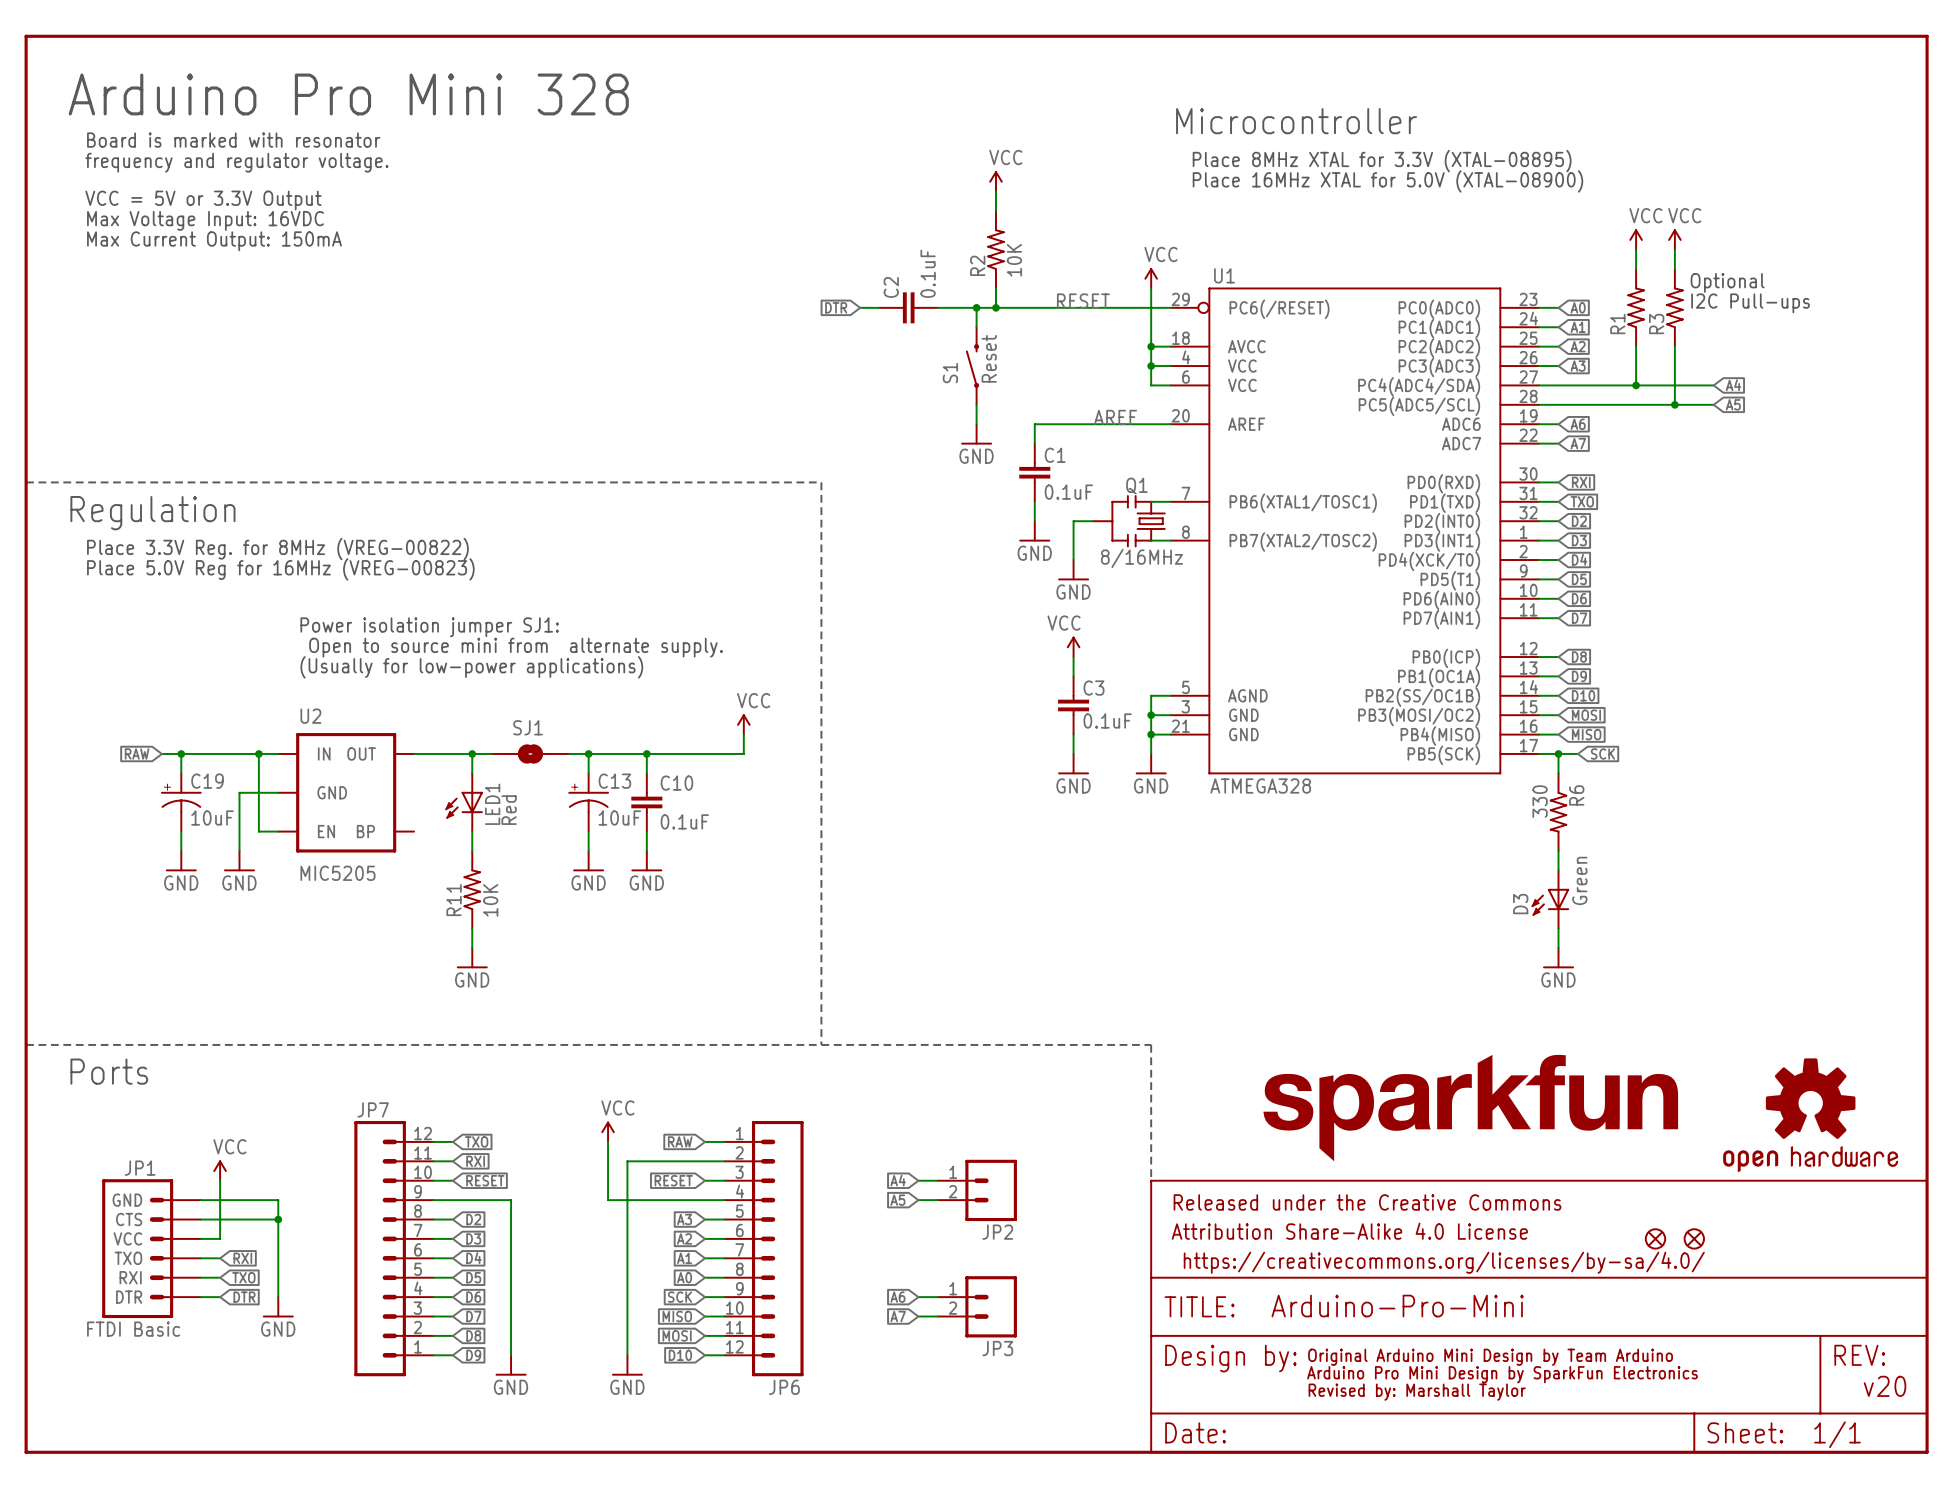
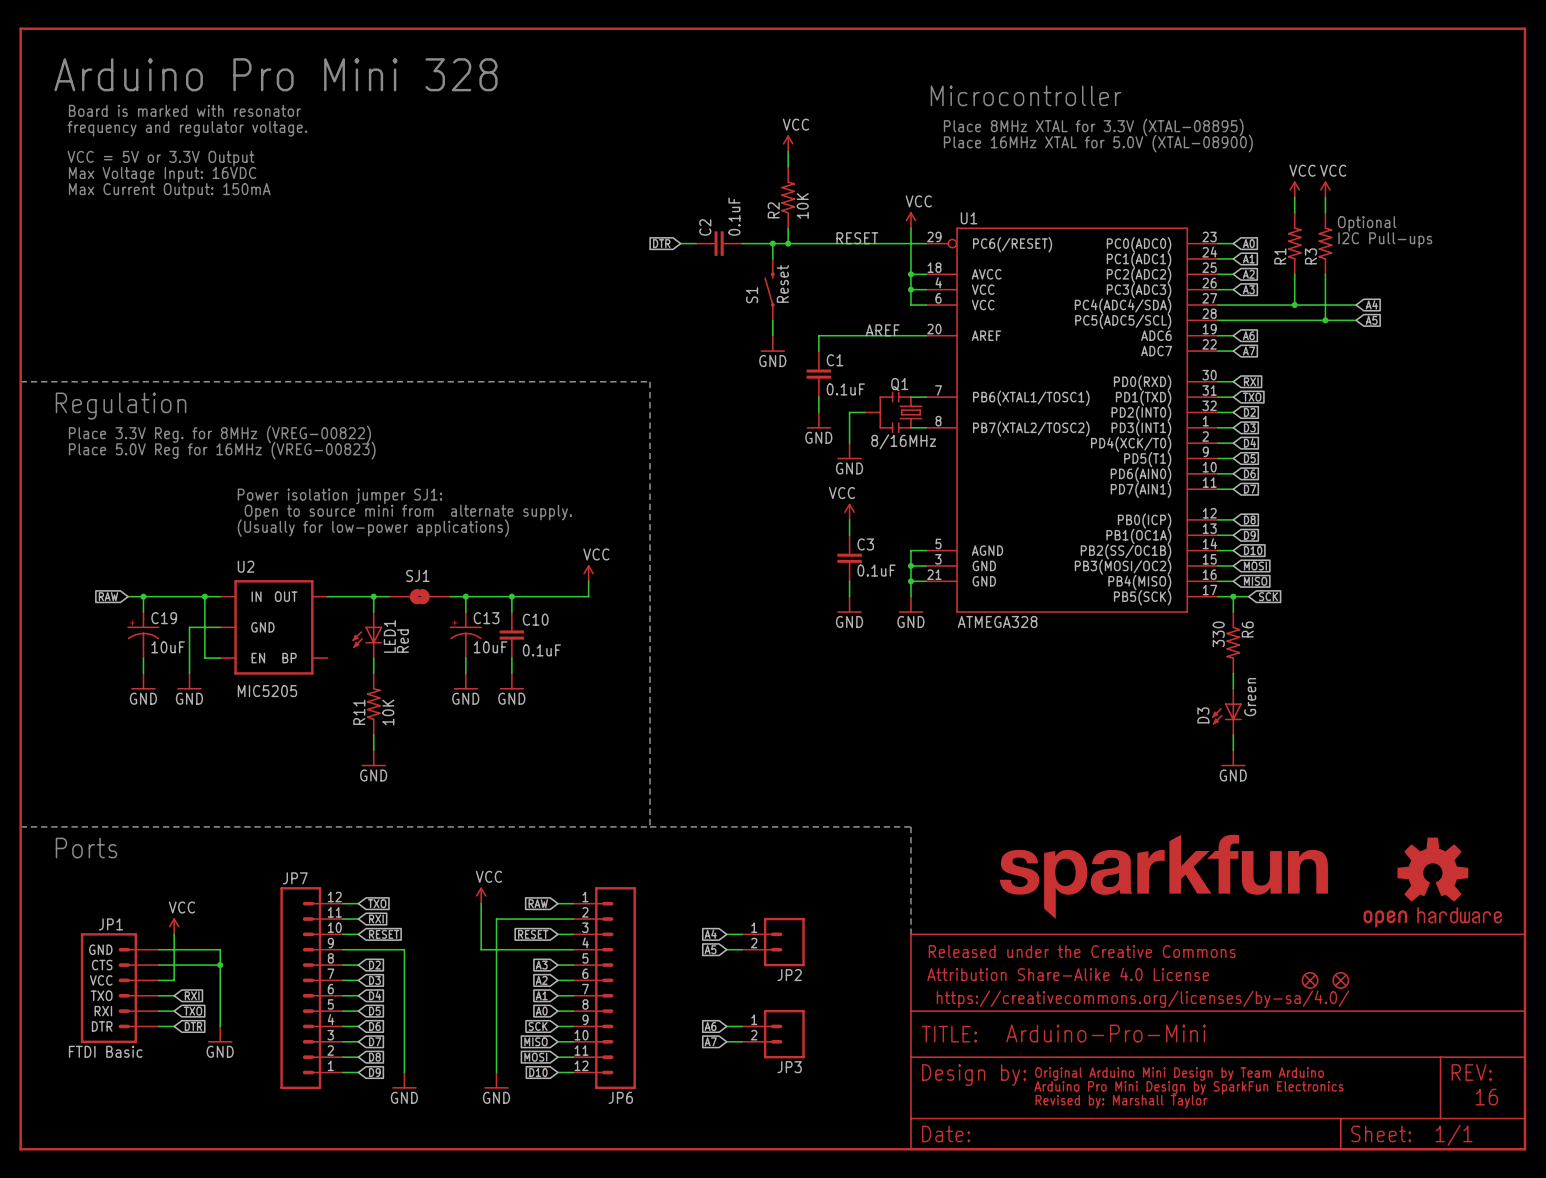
text: v20 (1884, 1386) -> 16 (1486, 1097)

